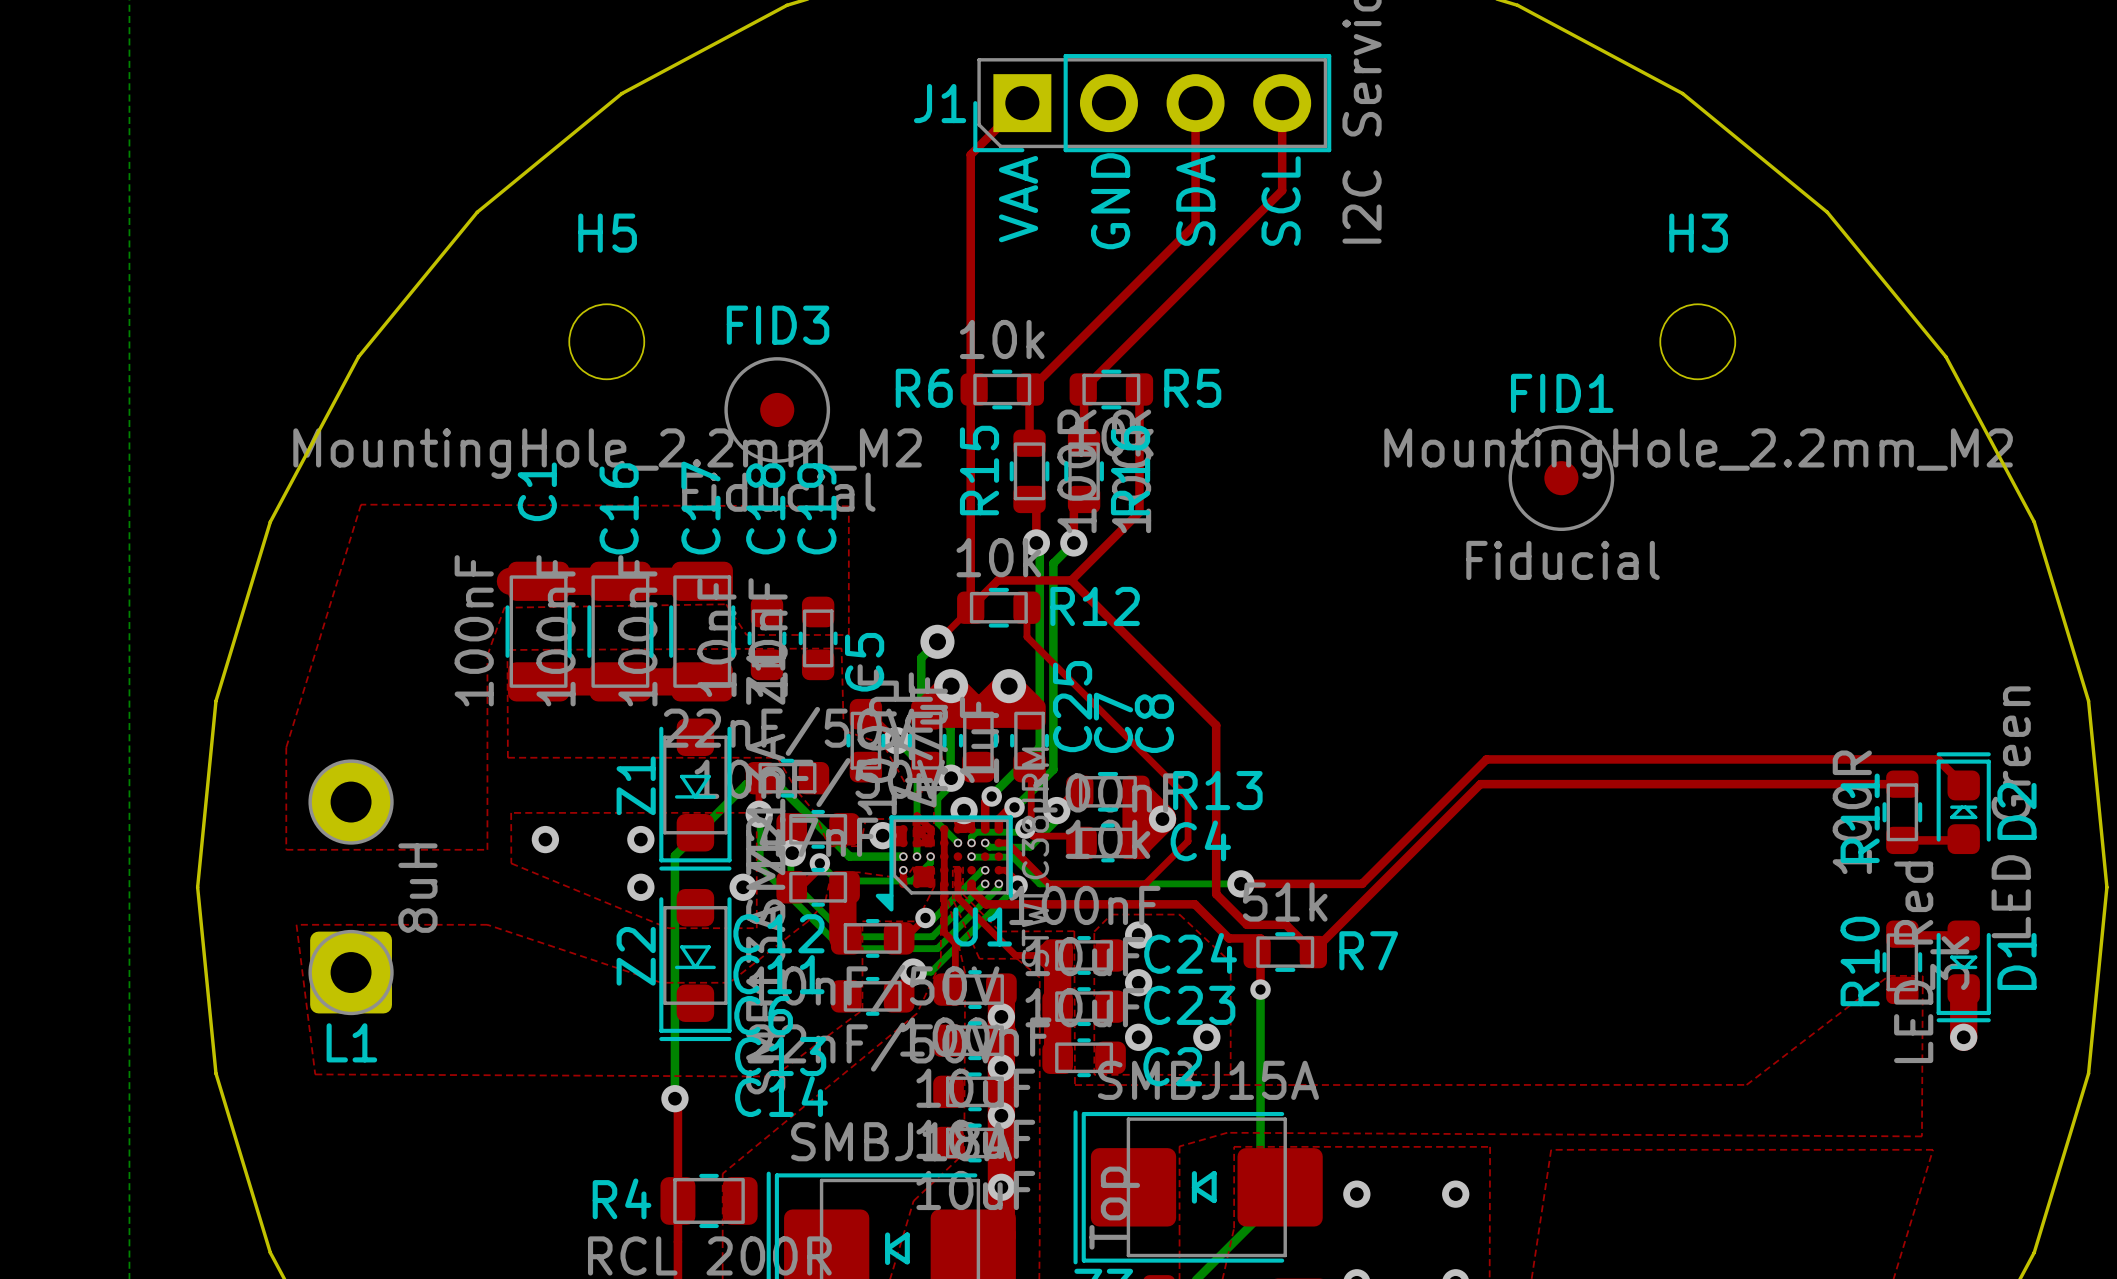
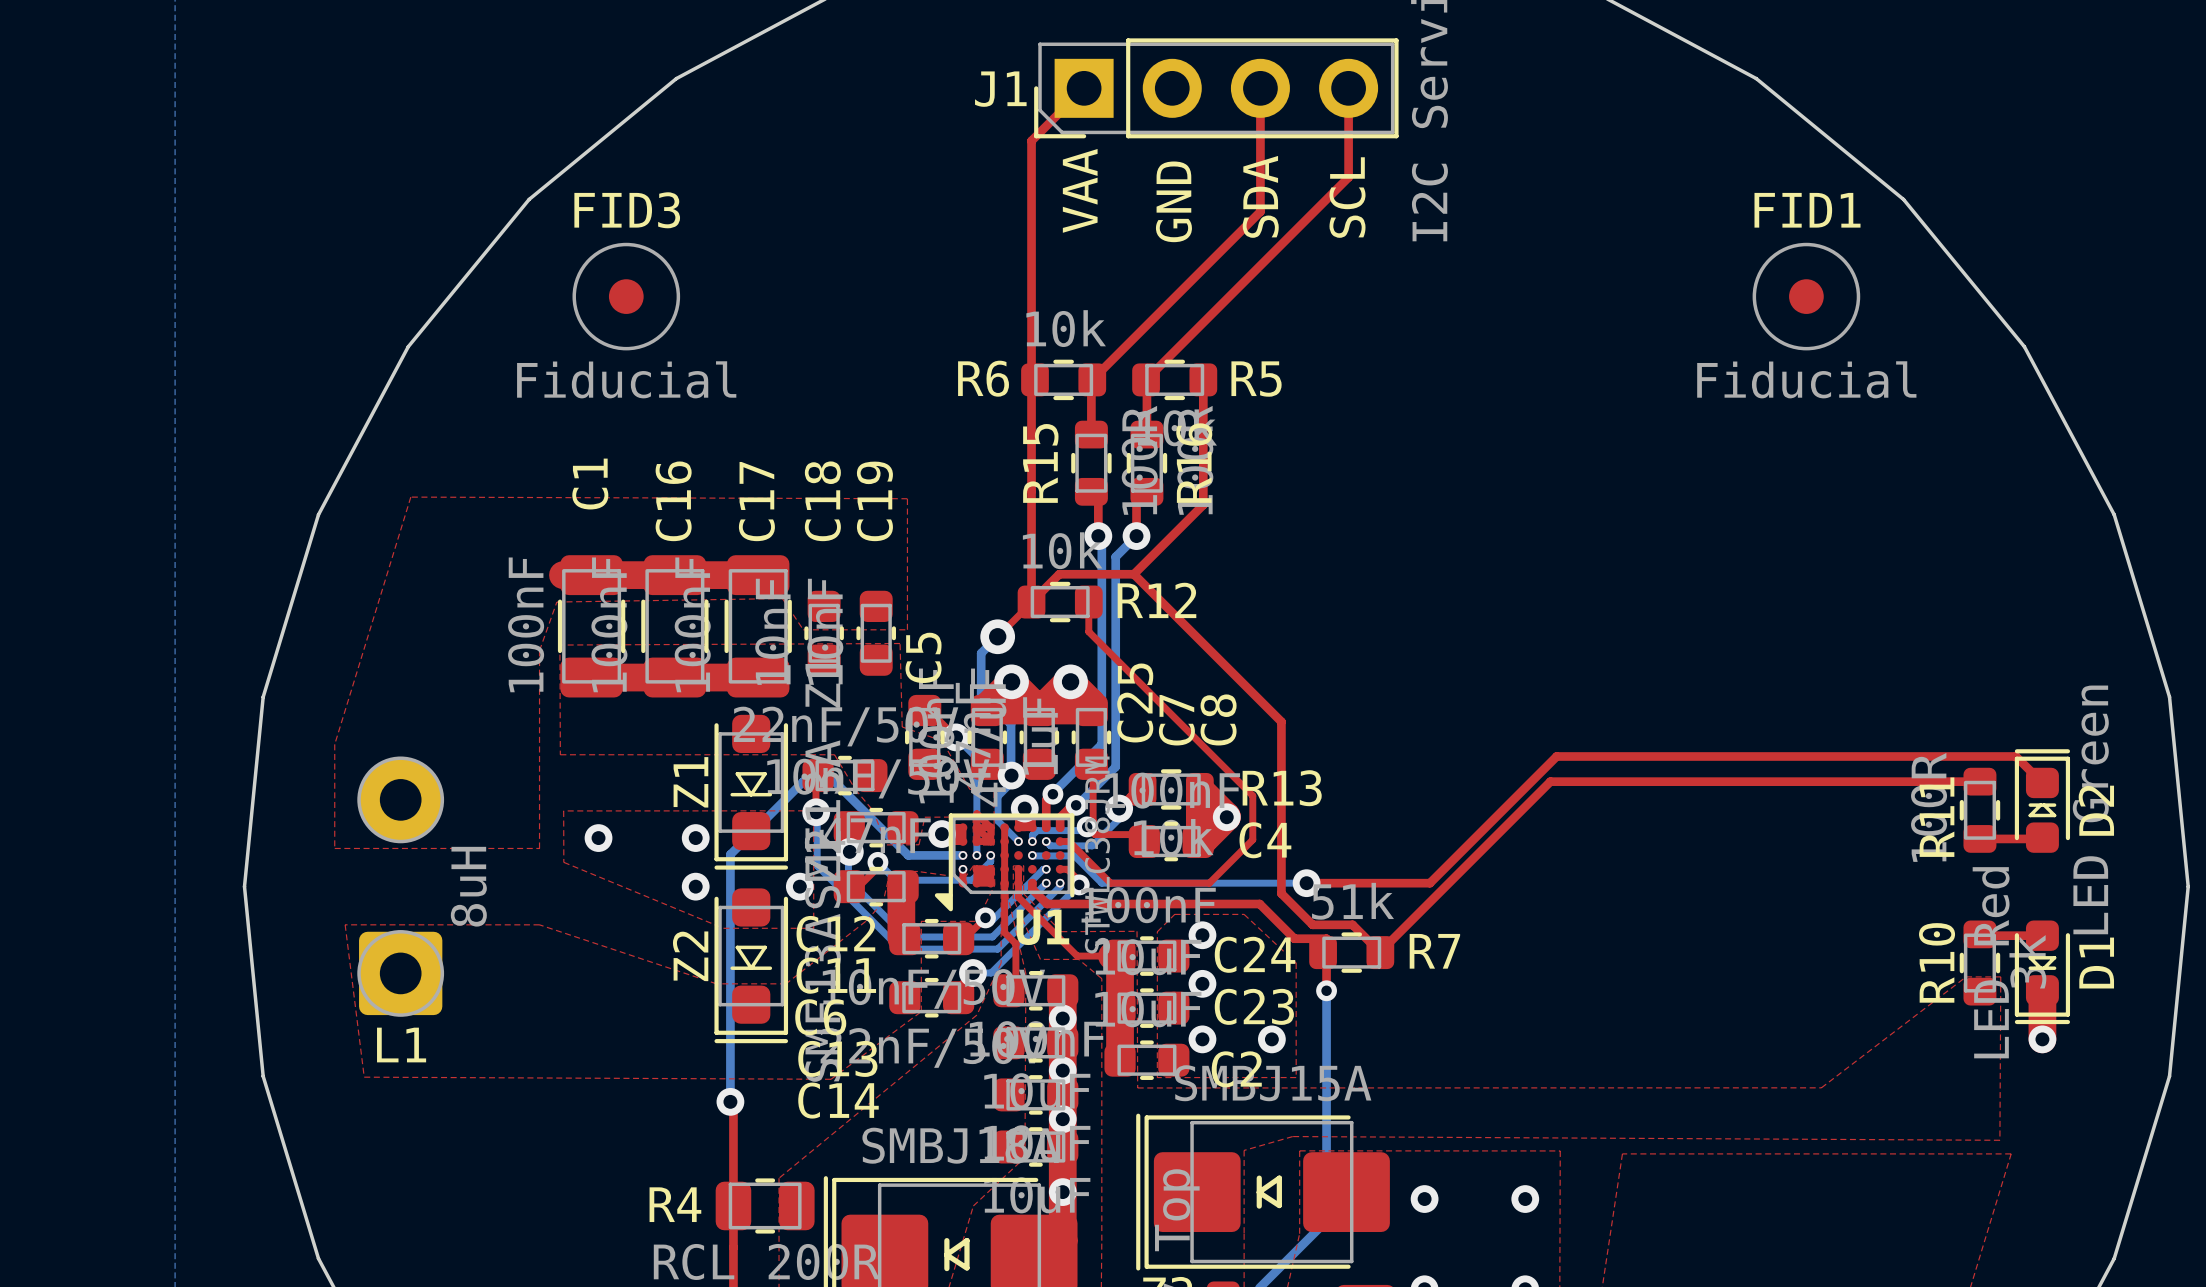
H5: MountingHole_2.2mm_M2 (606, 341) -> none
H3: MountingHole_2.2mm_M2 (1697, 341) -> none
FID3 position: (777, 409) -> (626, 296)
FID1 position: (1561, 478) -> (1806, 296)

